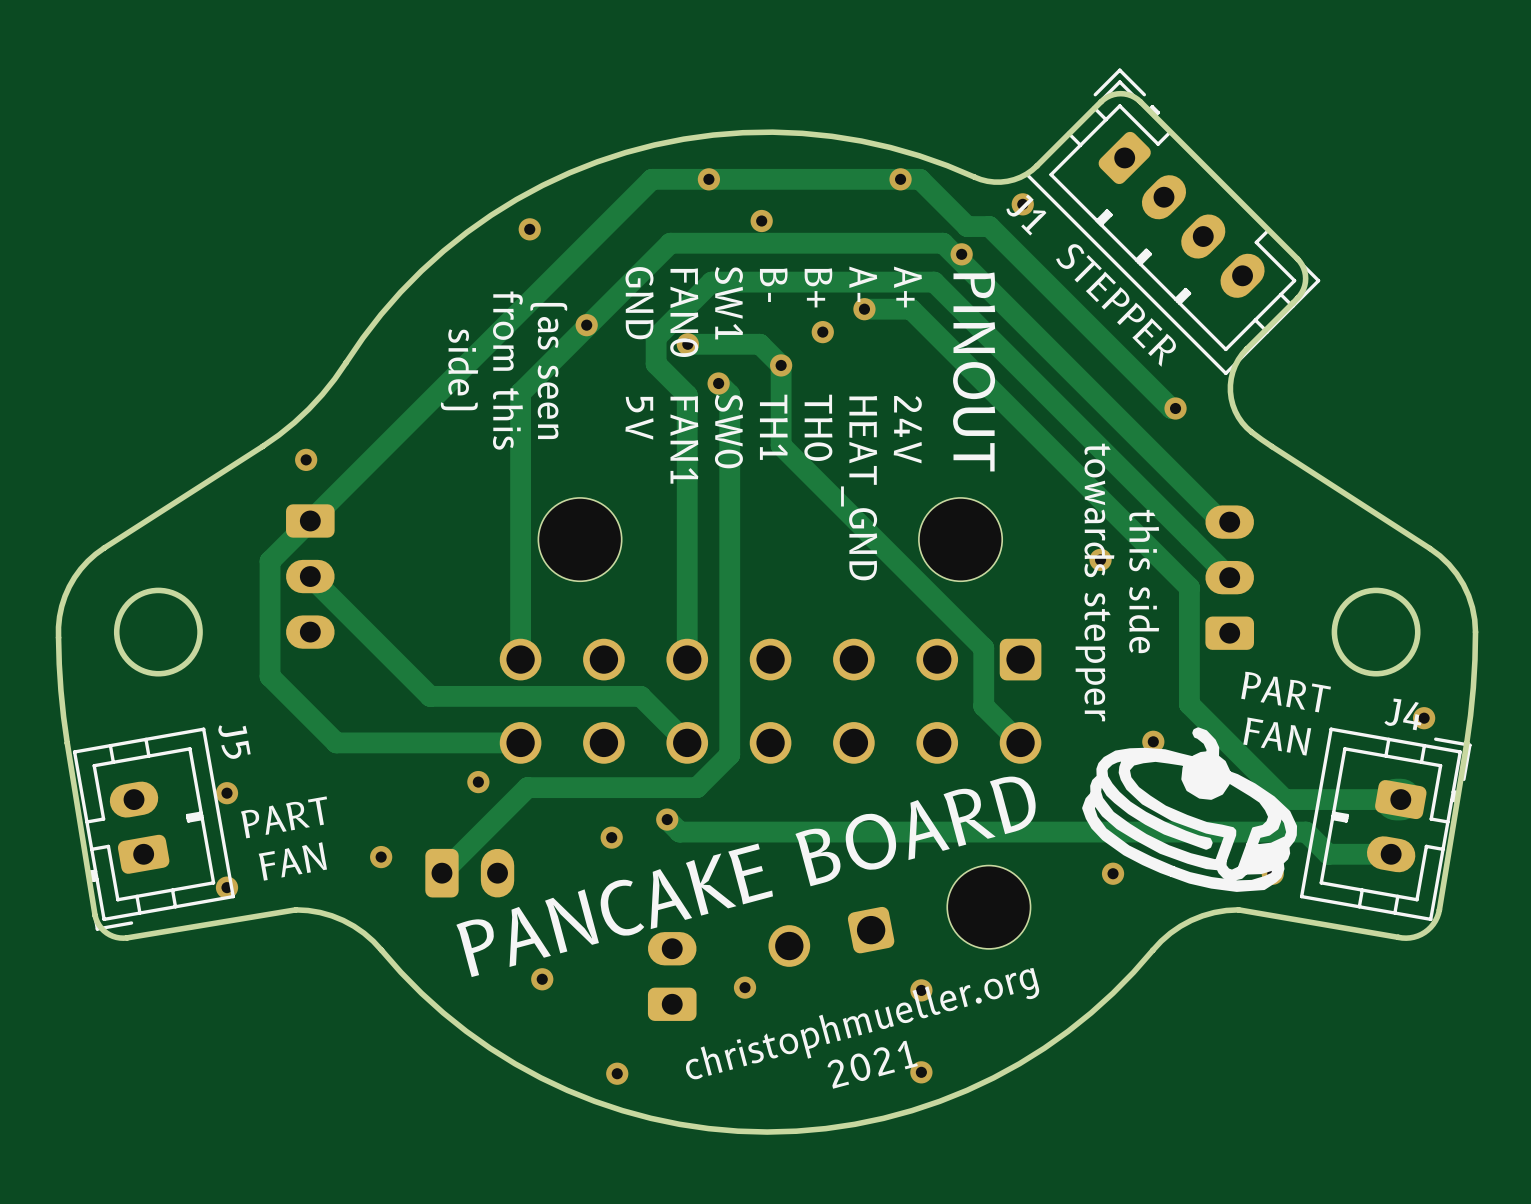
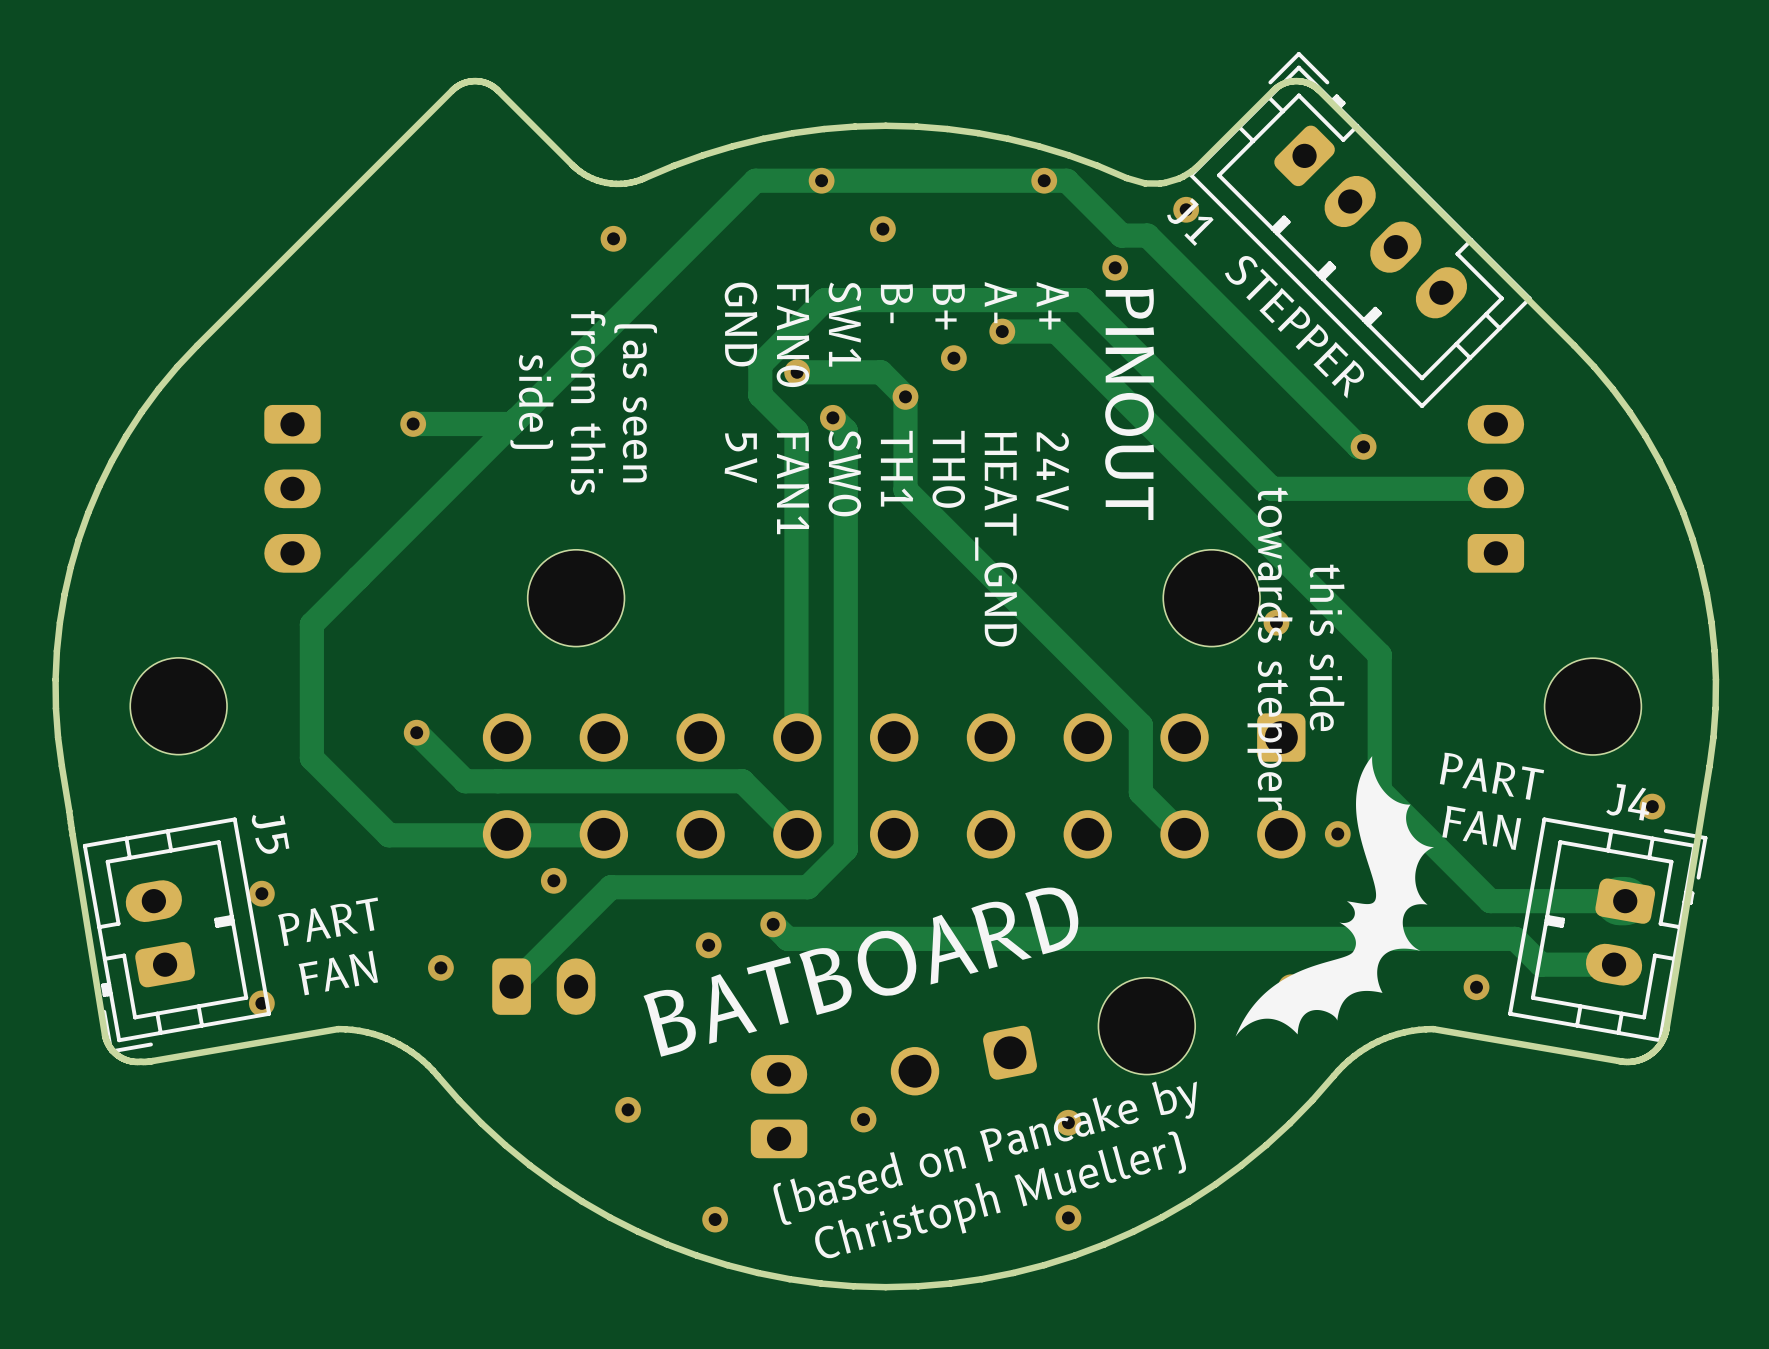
board edge: (1140, 101) (1297, 258) (1304, 271) (1305, 282) (1299, 295) (1246, 349) (1235, 365) (1231, 378) (1230, 391) (1232, 405) (1238, 417) (1246, 427) (1261, 439) (1439, 555) (1456, 574) (1468, 595) (1472, 607) (1475, 632) (1470, 715) (1439, 909) (1435, 920) (1427, 930) (1413, 937) (1402, 937) (1238, 909) (1202, 915) (1170, 933) (1112, 993) (1068, 1031) (1044, 1048) (993, 1077) (939, 1101) (883, 1118) (825, 1128) (767, 1132) (708, 1128) (650, 1118) (594, 1101) (540, 1077) (515, 1063) (466, 1031) (421, 993) (364, 933) (331, 915) (295, 909) (123, 938) (109, 934) (101, 928) (95, 915) (67, 743) (60, 690) (58, 627) (61, 606) (69, 586) (80, 569) (95, 554) (262, 446) (294, 422) (322, 394) (362, 338) (400, 292) (443, 250) (466, 232) (516, 199) (569, 172) (597, 161) (654, 145) (713, 135) (772, 132) (832, 136) (890, 147) (919, 155) (980, 179) (994, 182) (1007, 181) (1020, 177) (1031, 170) (1106, 97) (1124, 93) (1140, 101) -> (1297, 81) (1309, 84) (1319, 90) (1594, 366) (1612, 389) (1645, 436) (1659, 461) (1683, 512) (1700, 566) (1711, 622) (1715, 679) (1715, 708) (1709, 766) (1666, 1029) (1661, 1042) (1652, 1052) (1640, 1059) (1624, 1061) (1433, 1029) (1398, 1033) (1371, 1044) (1348, 1060) (1289, 1123) (1241, 1165) (1189, 1201) (1133, 1231) (1074, 1255) (1013, 1272) (950, 1283) (885, 1287) (821, 1283) (758, 1272) (696, 1255) (638, 1231) (582, 1201) (529, 1165) (481, 1123) (422, 1060) (399, 1044) (373, 1033) (338, 1029) (146, 1061) (127, 1060) (111, 1049) (105, 1035) (61, 766) (55, 708) (55, 679) (59, 622) (70, 566) (88, 512) (111, 461) (126, 436) (158, 389) (177, 366) (454, 88) (472, 81) (482, 82) (491, 85) (576, 168) (592, 178) (611, 183) (635, 181) (703, 155) (763, 138) (824, 129) (885, 125) (947, 129) (1008, 138) (1068, 155) (1126, 178) (1145, 183) (1160, 183) (1178, 178) (1191, 171) (1276, 88) (1285, 82) (1297, 81)
via: (586, 325) -> none
track: none -> (512, 423) (413, 423)
track: (1096, 444) (1229, 577) -> (1271, 488) (1495, 488)
via position: (306, 459) -> (413, 423)
part footprint: [499, 497, 1042, 764] -> [482, 549, 1306, 859]
track: (1229, 522) (1222, 522) (943, 243) (670, 243) (520, 393) (520, 659) -> none
track: (310, 576) (430, 696) -> (416, 732) (465, 781) (497, 781)
part position: (310, 576) -> (292, 488)
part position: (1229, 577) -> (1495, 488)
round board edge: [113, 587, 203, 677] -> none
round board edge: [1331, 587, 1421, 677] -> none
part: none -> (178, 706)
part: none -> (1592, 706)
via: none -> (416, 732)
drawing: none -> [1235, 756, 1435, 1037]
drawing: [1082, 727, 1298, 892] -> none
text: PANCAKE BOARD (746, 876) -> BATBOARD (860, 972)
text: christophmueller.org (862, 1023) -> (based on Pancake by (985, 1153)
text: 2021 (872, 1064) -> Christoph Mueller) (1000, 1194)

